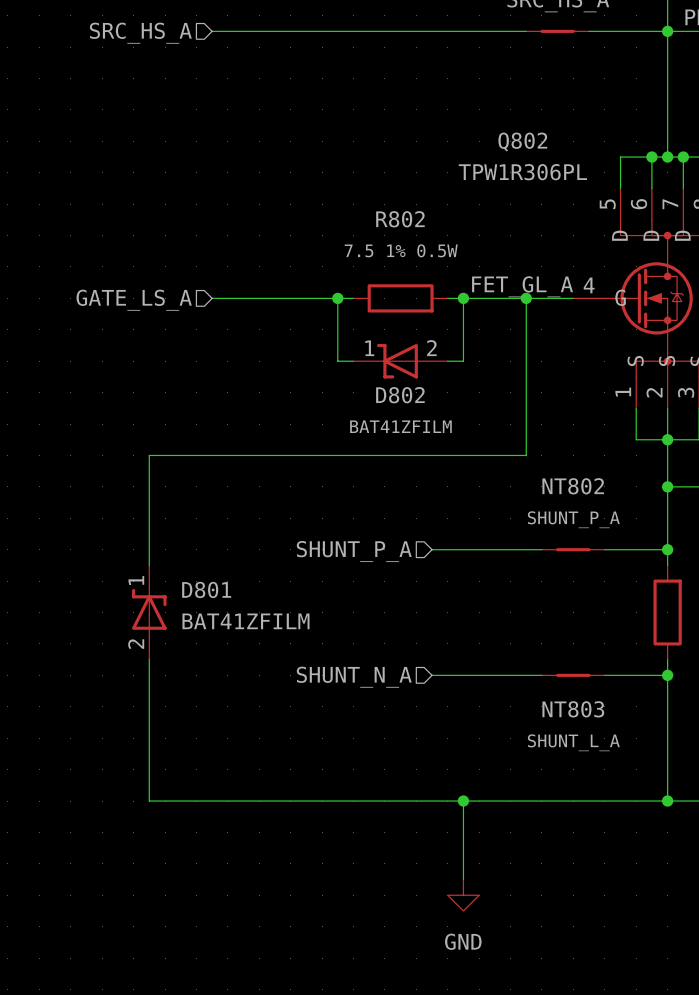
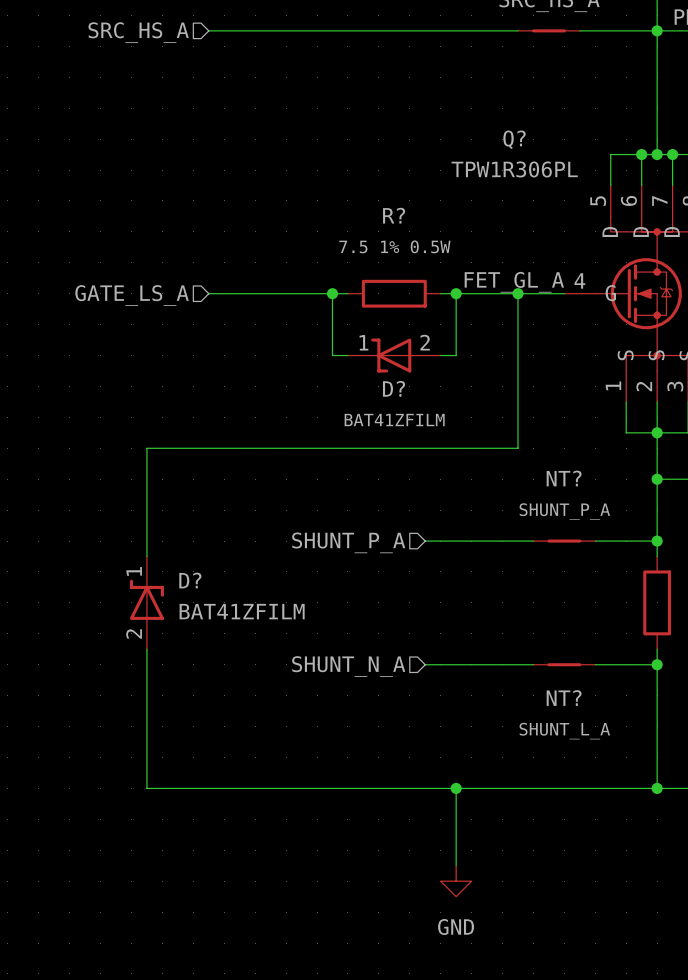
Q802 name: Q802 (522, 142) -> Q? (514, 139)
R802 name: R802 (400, 219) -> R? (394, 215)
D802 name: D802 (400, 395) -> D? (394, 388)
NT802 name: NT802 (573, 486) -> NT? (564, 478)
D801 name: D801 (206, 589) -> D? (190, 580)
NT803 name: NT803 (573, 709) -> NT? (564, 698)

